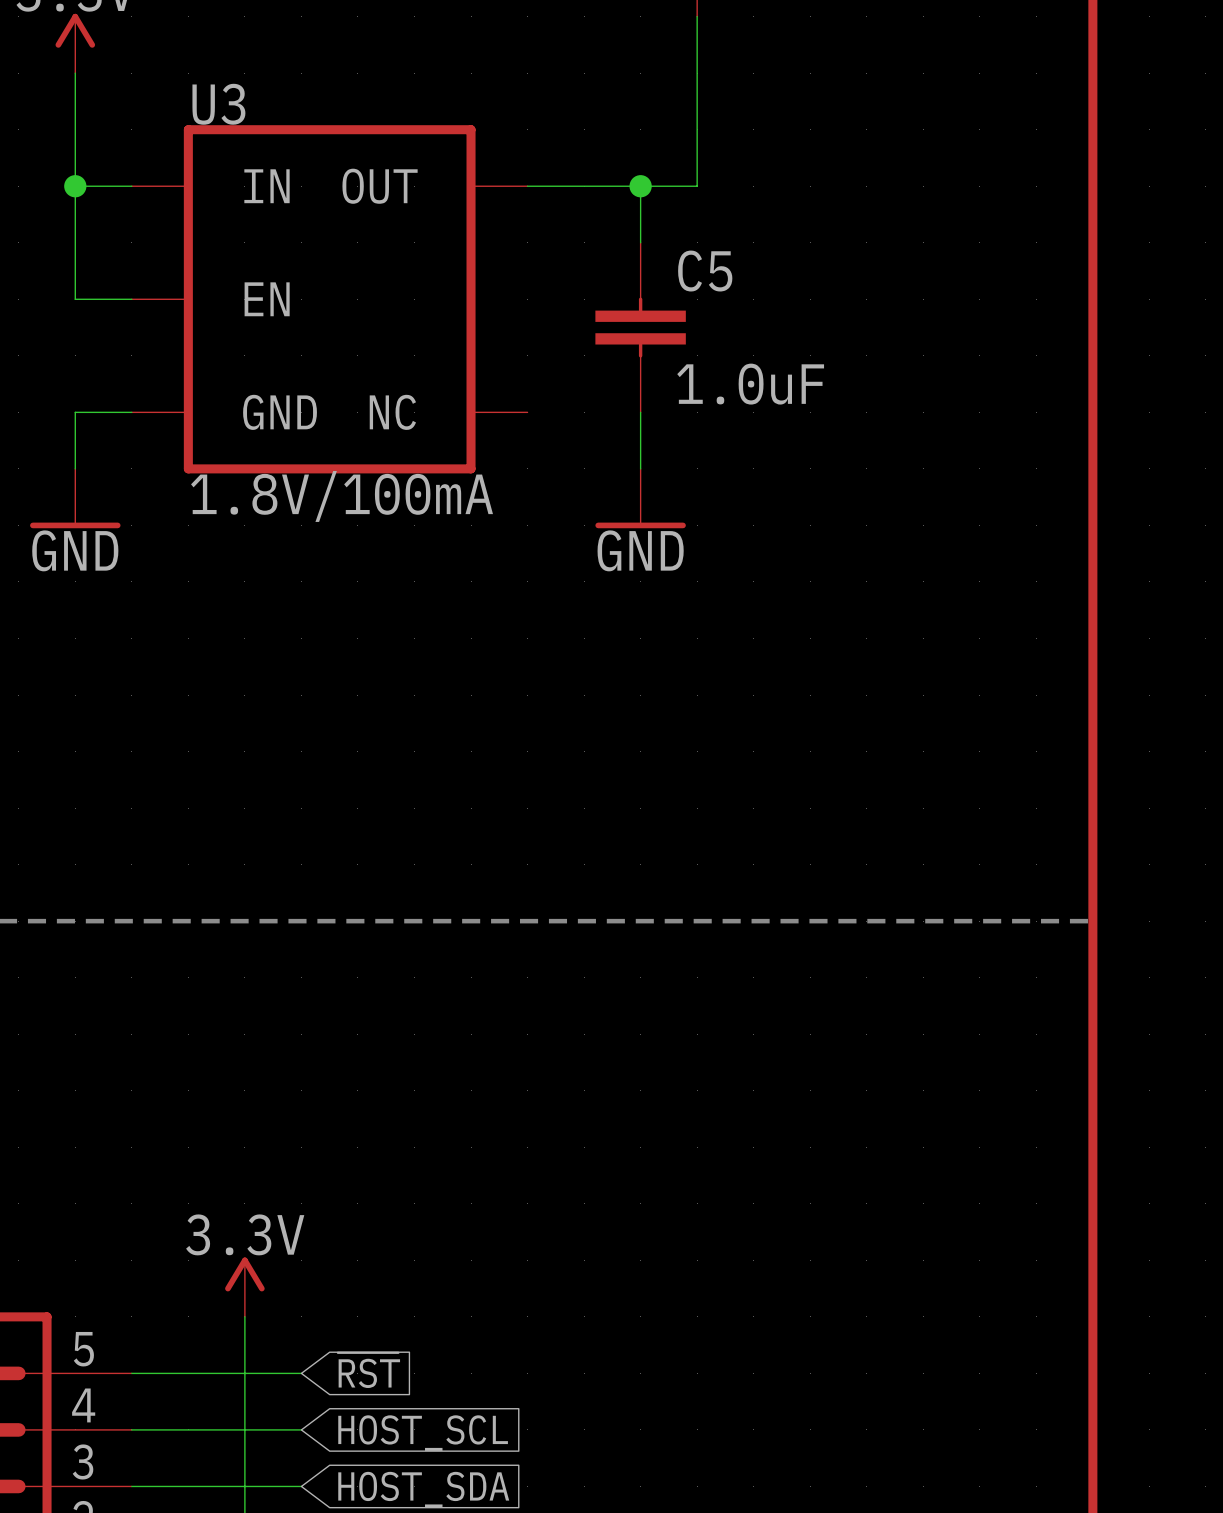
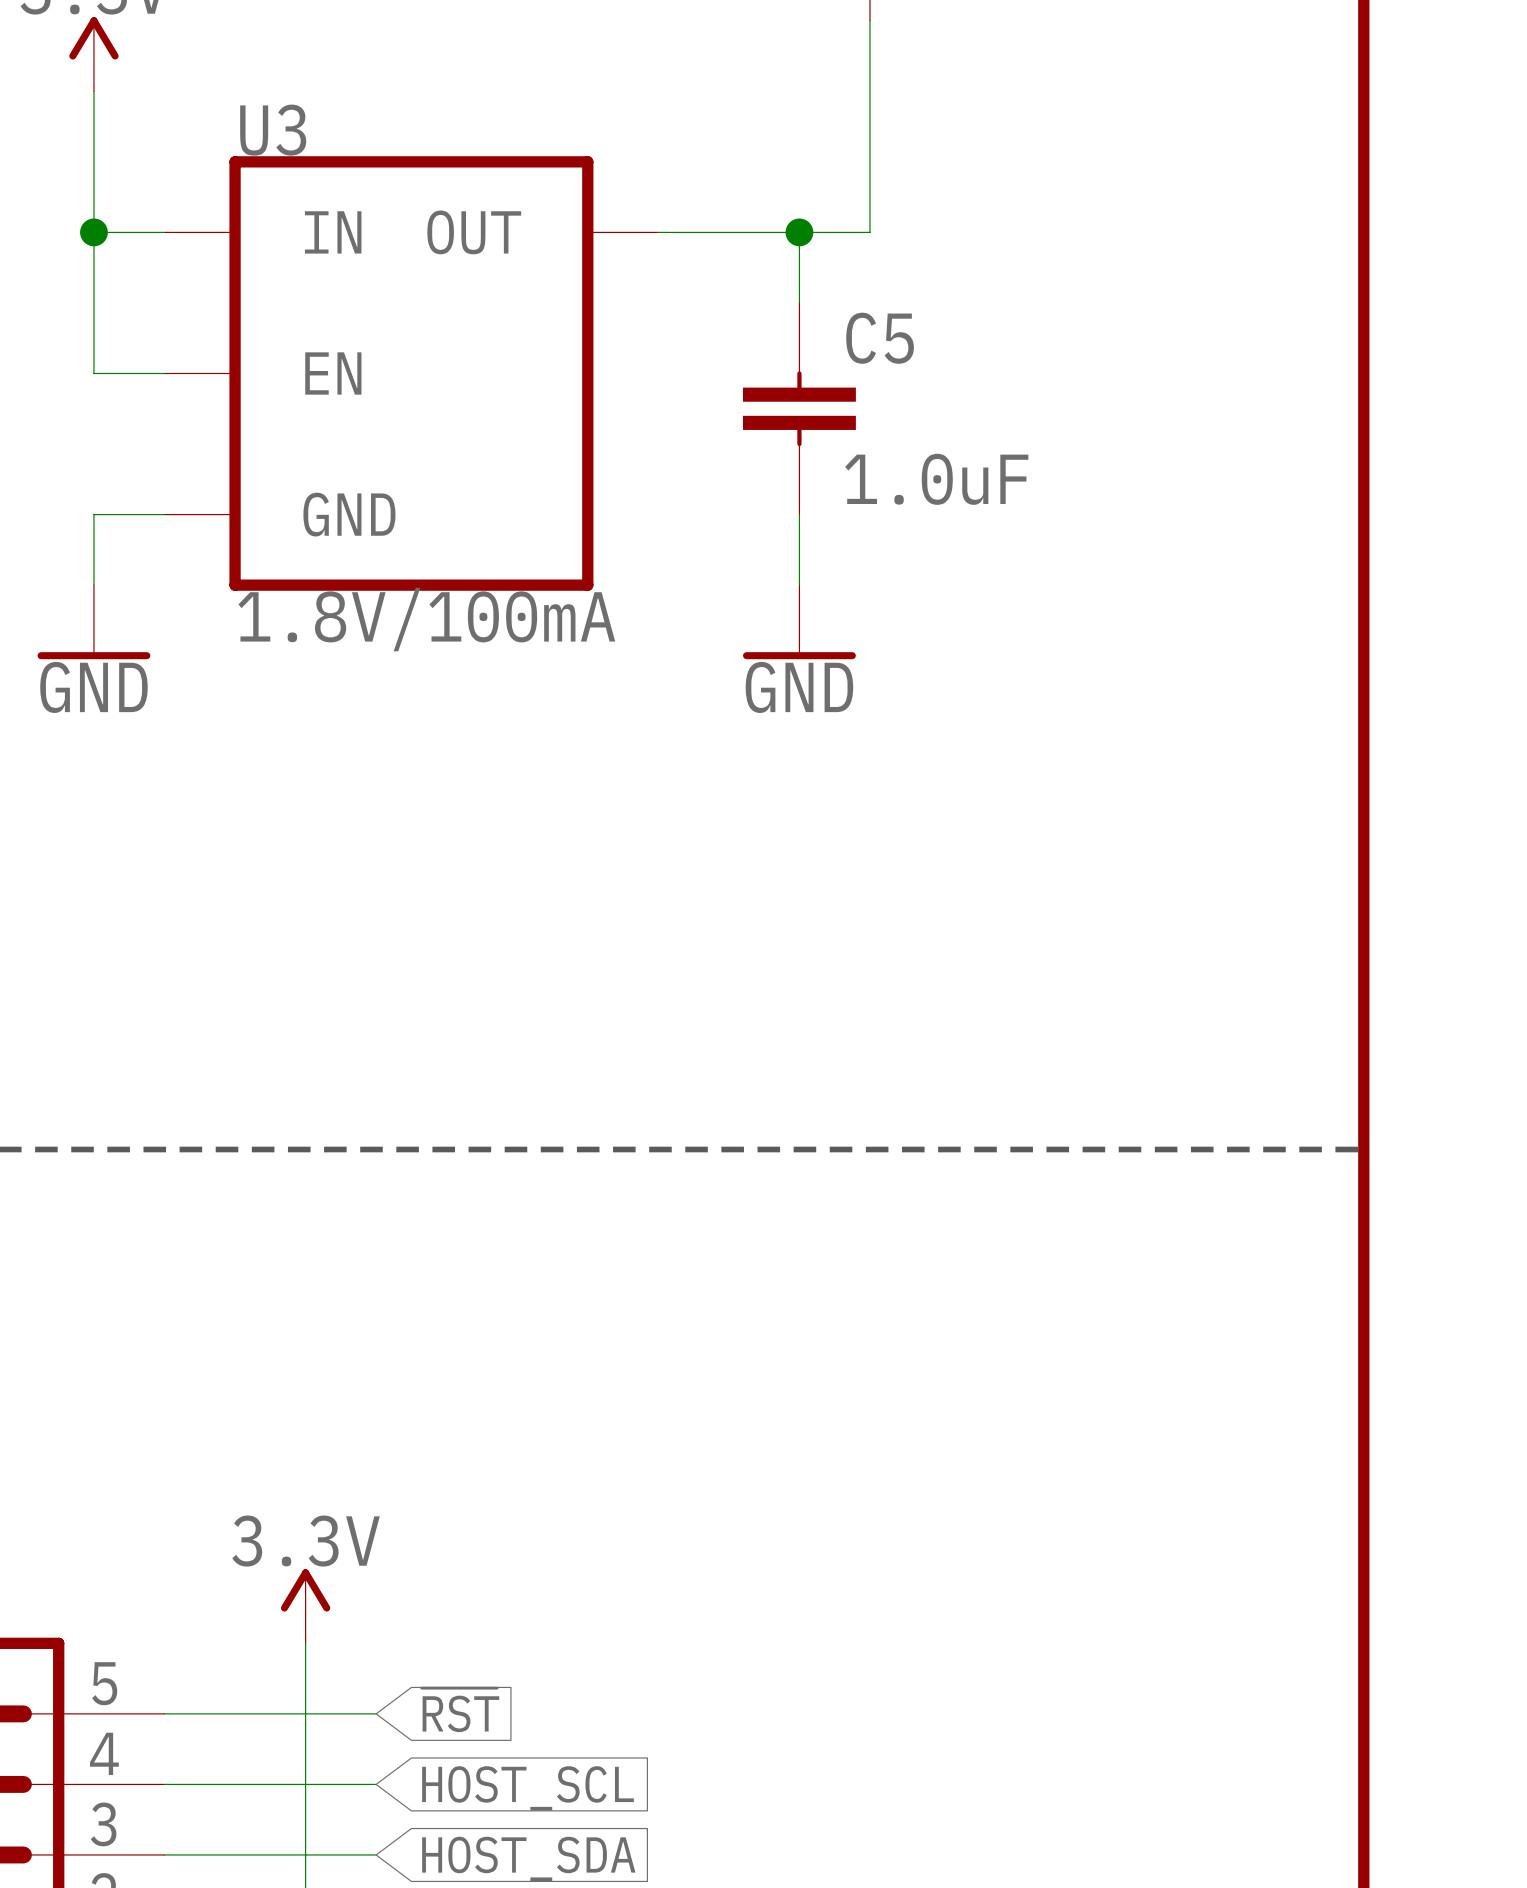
U3 symbol: [131, 125, 528, 474] -> [164, 156, 659, 591]

